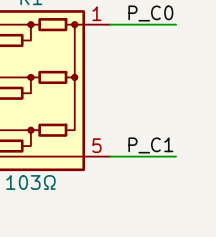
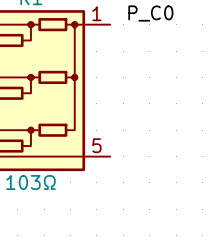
wire: (110, 24) (176, 24) -> none
label: P_C1 (150, 145) -> none
wire: (110, 156) (176, 156) -> none

